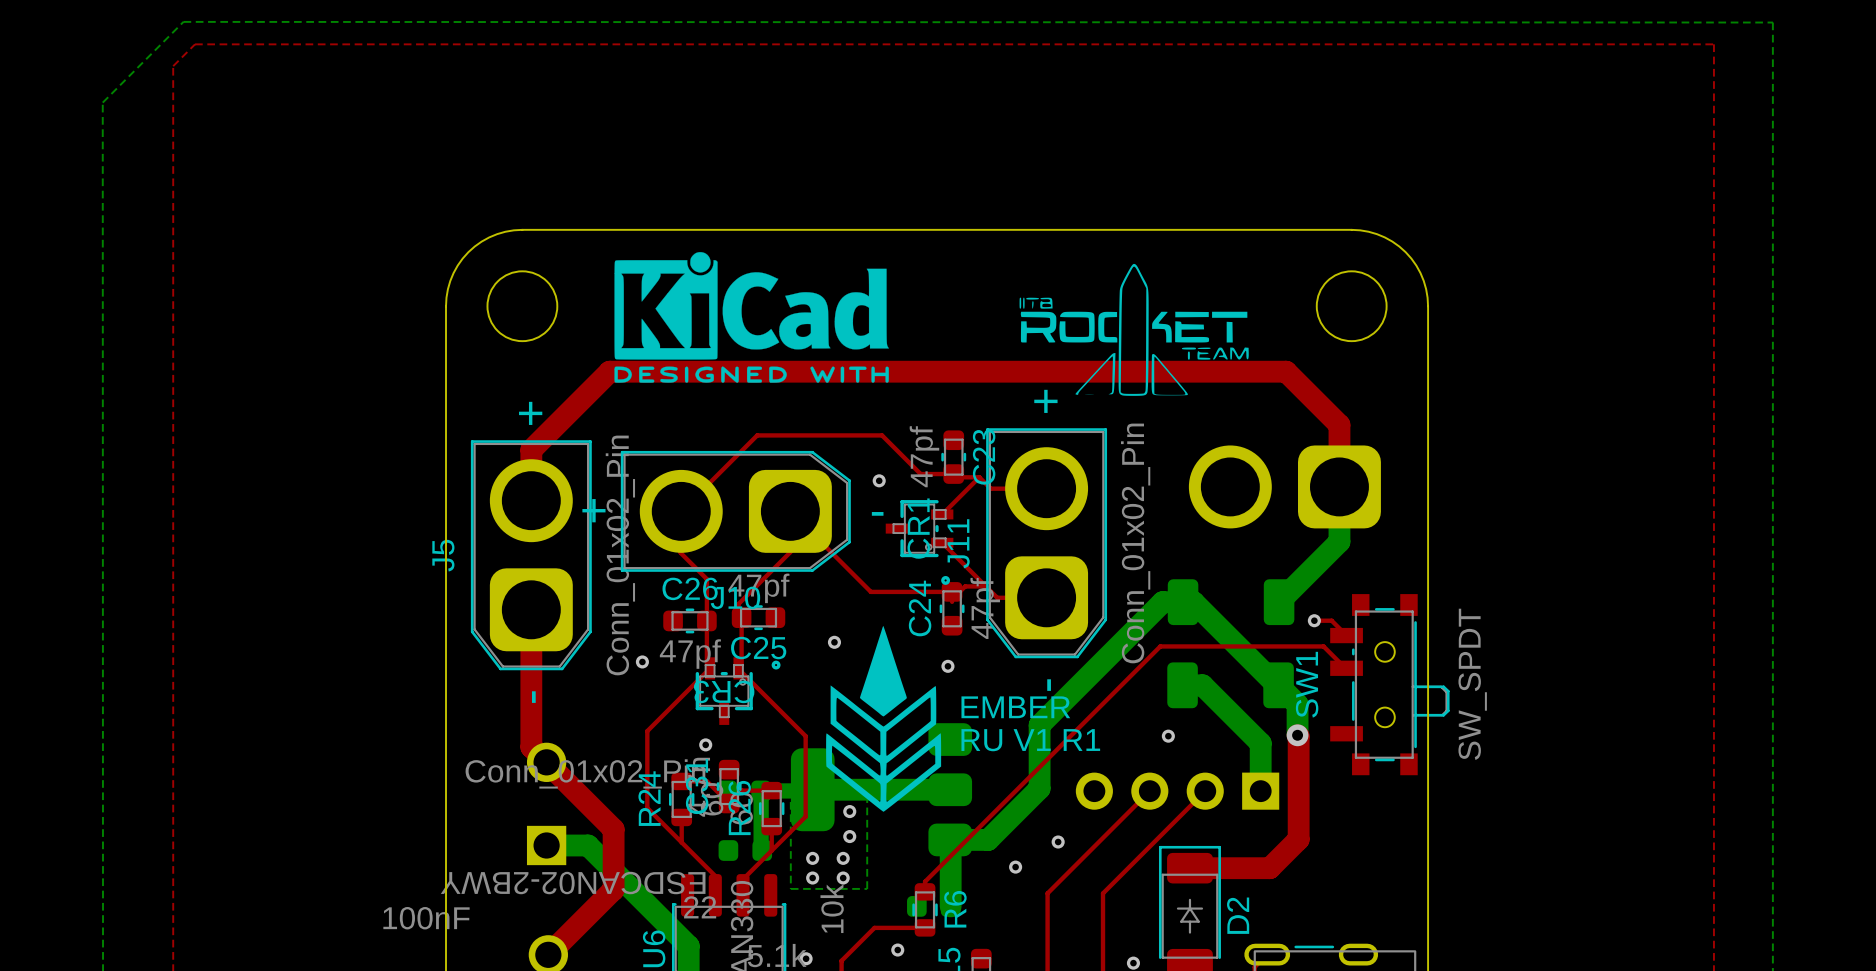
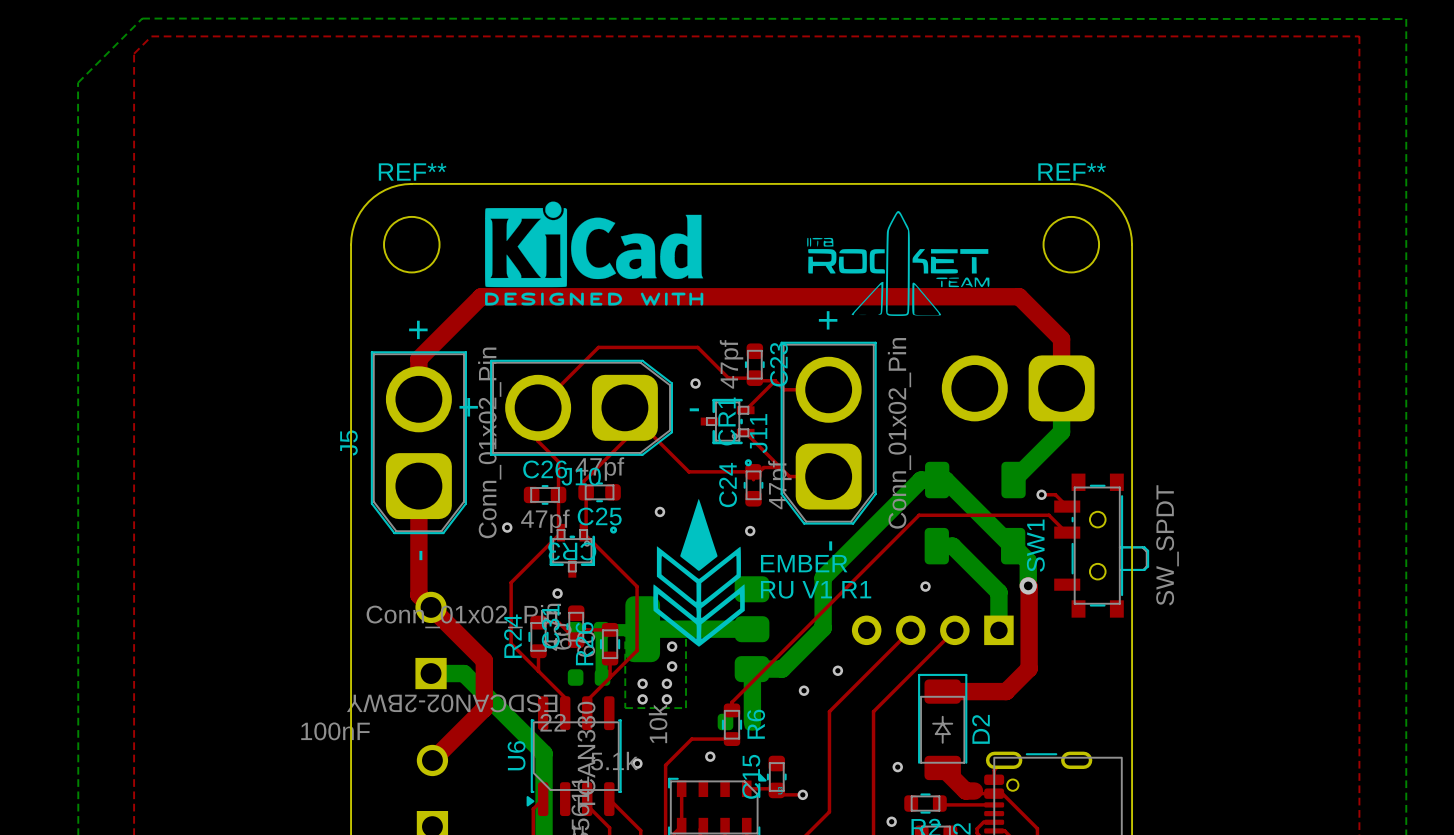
REF** name: none -> REF** (412, 172)
REF** name: none -> REF** (1072, 172)

